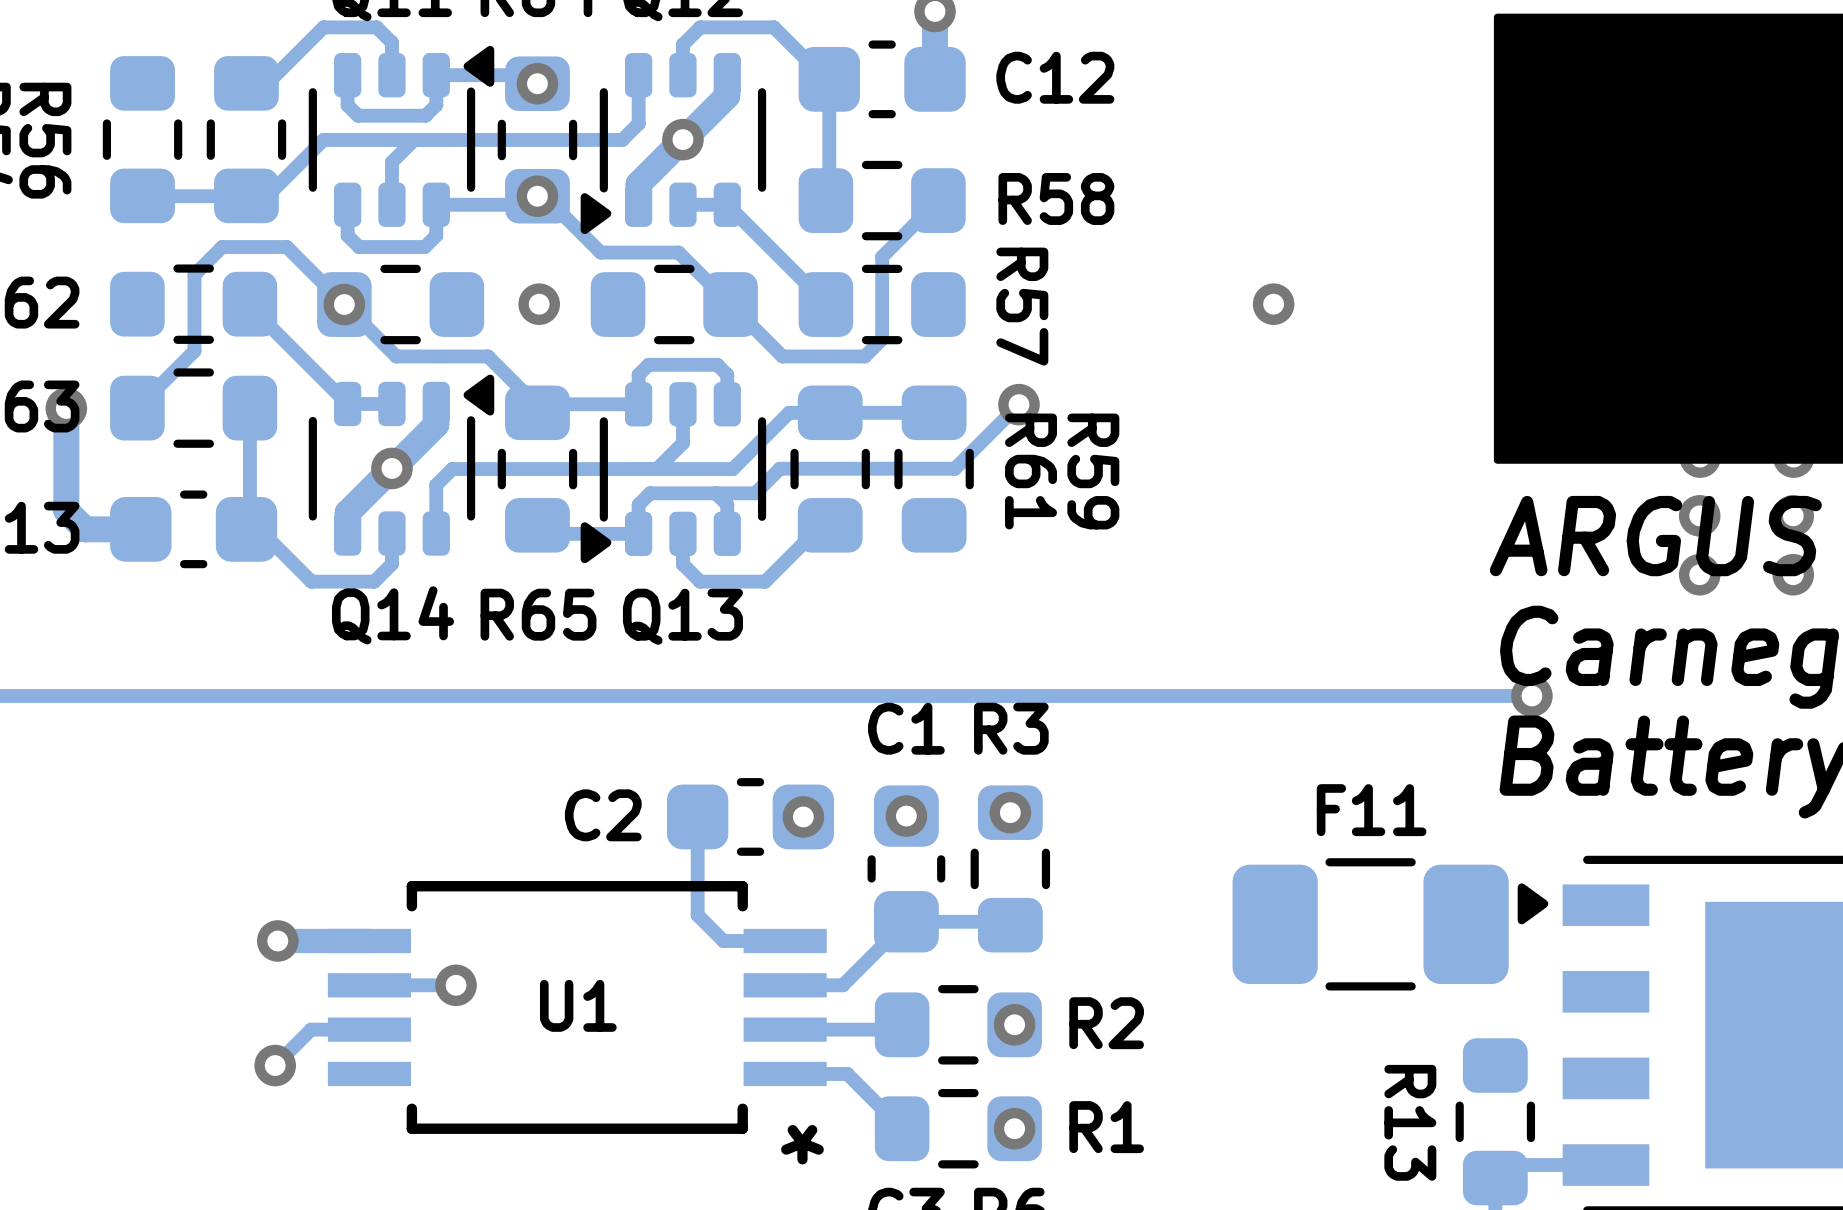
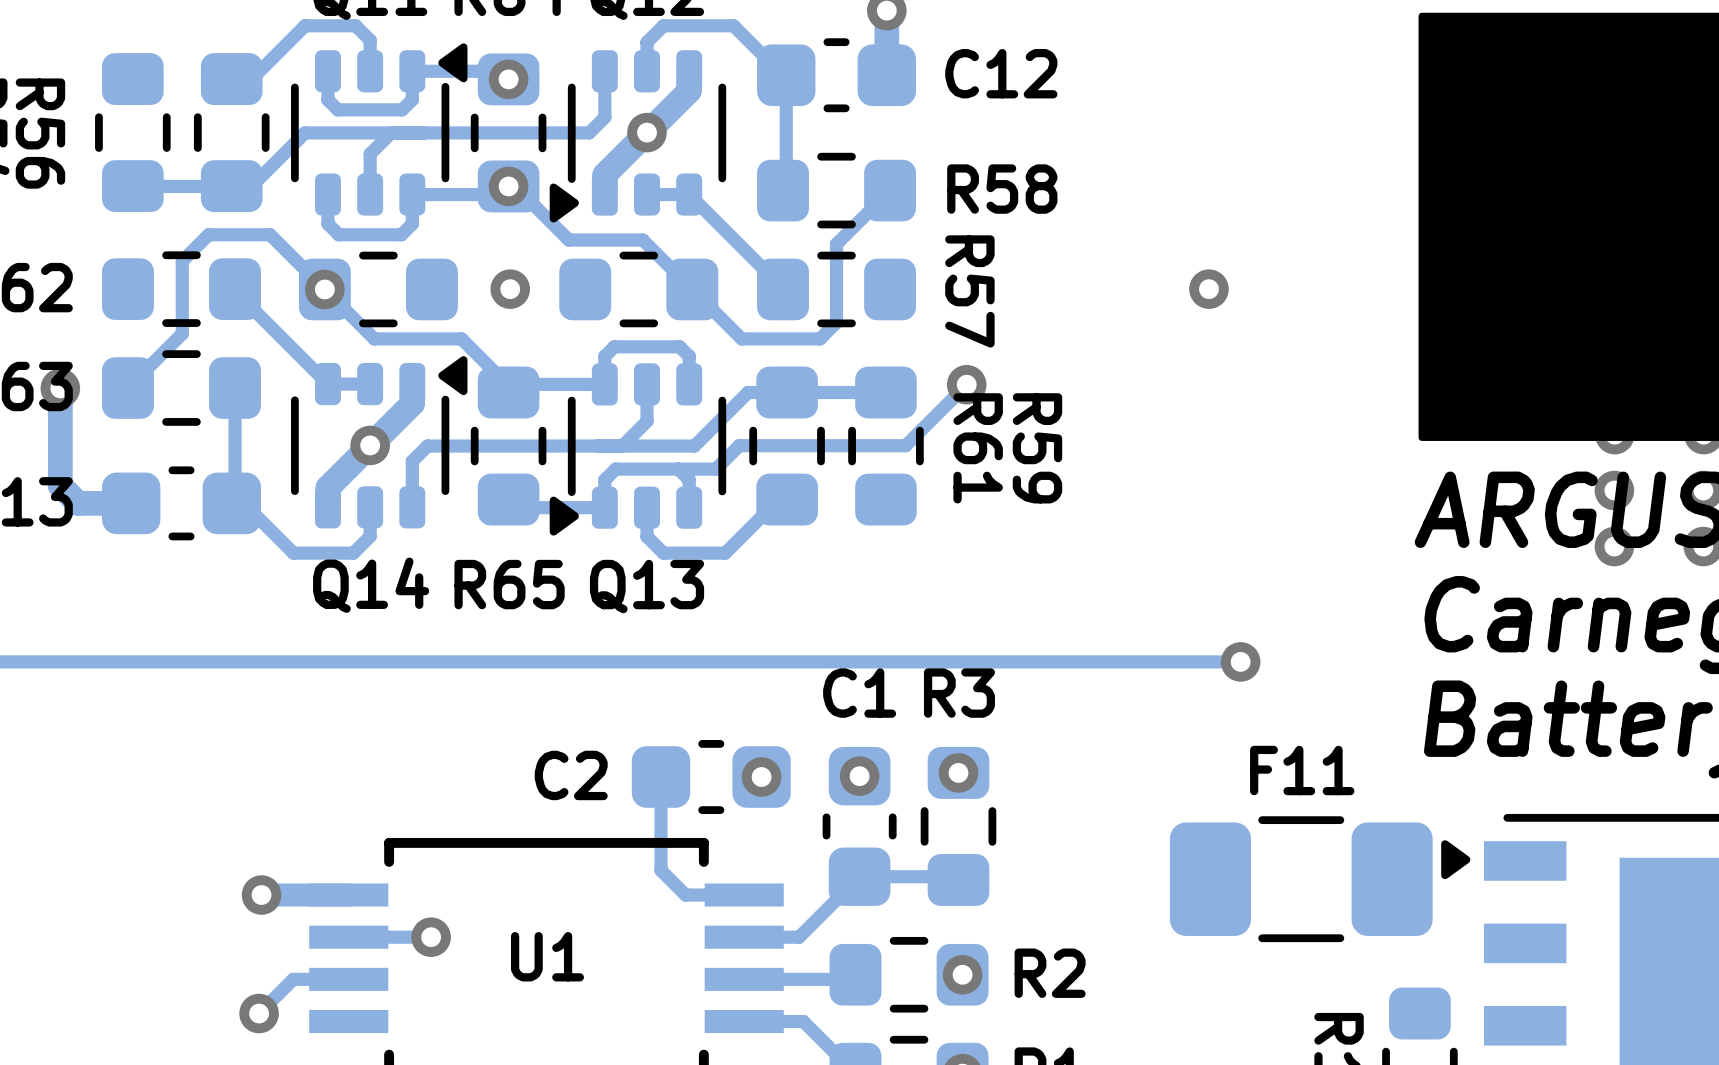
track: (1531, 695) (1306, 695) -> none
via position: (1531, 695) -> (1240, 661)

